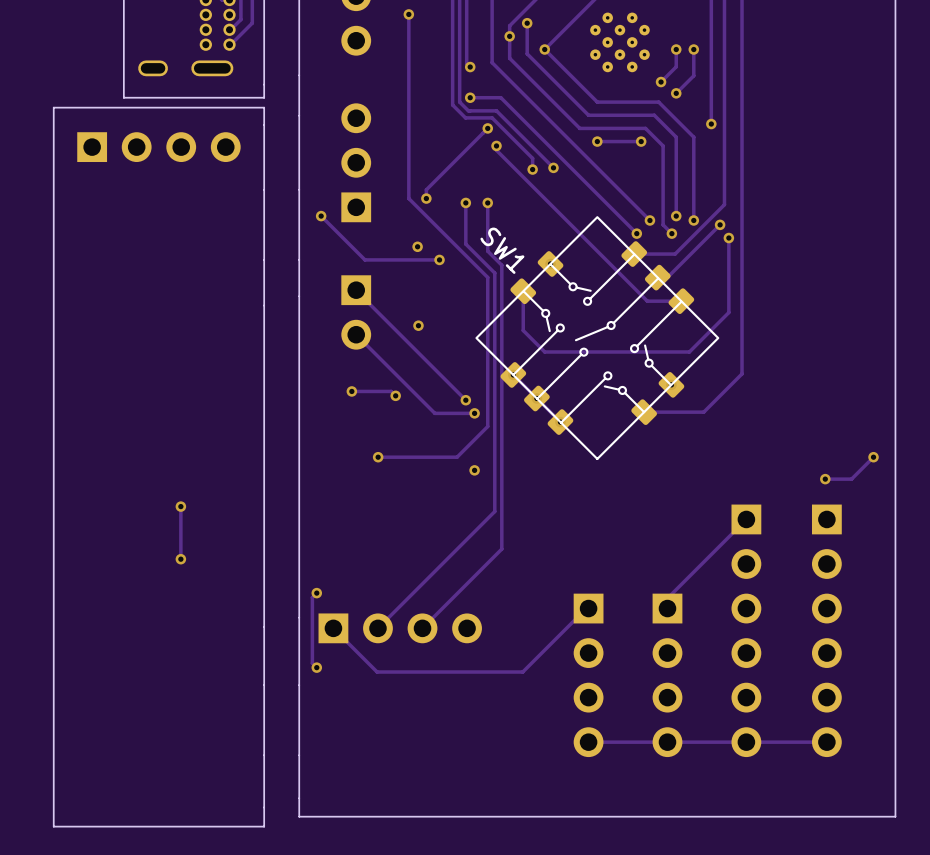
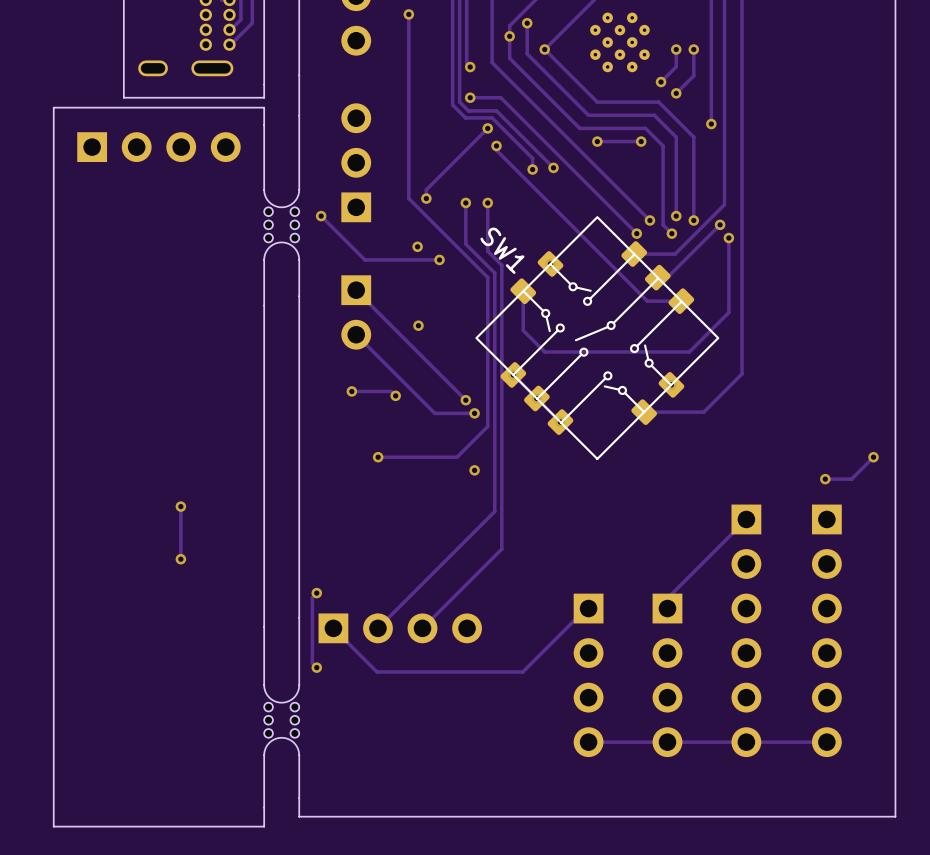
board edge: (264, 189) (264, 259) -> (299, 259) (294, 247) (281, 242) (269, 247) (264, 259)
board edge: (299, 189) (299, 259) -> (299, 189) (294, 202) (281, 207) (269, 202) (264, 189)
part: none -> (281, 224)
board edge: (264, 685) (264, 755) -> (299, 755) (294, 742) (281, 737) (269, 742) (264, 755)
board edge: (299, 685) (299, 755) -> (299, 685) (294, 697) (281, 702) (269, 697) (264, 685)
part: none -> (281, 720)

